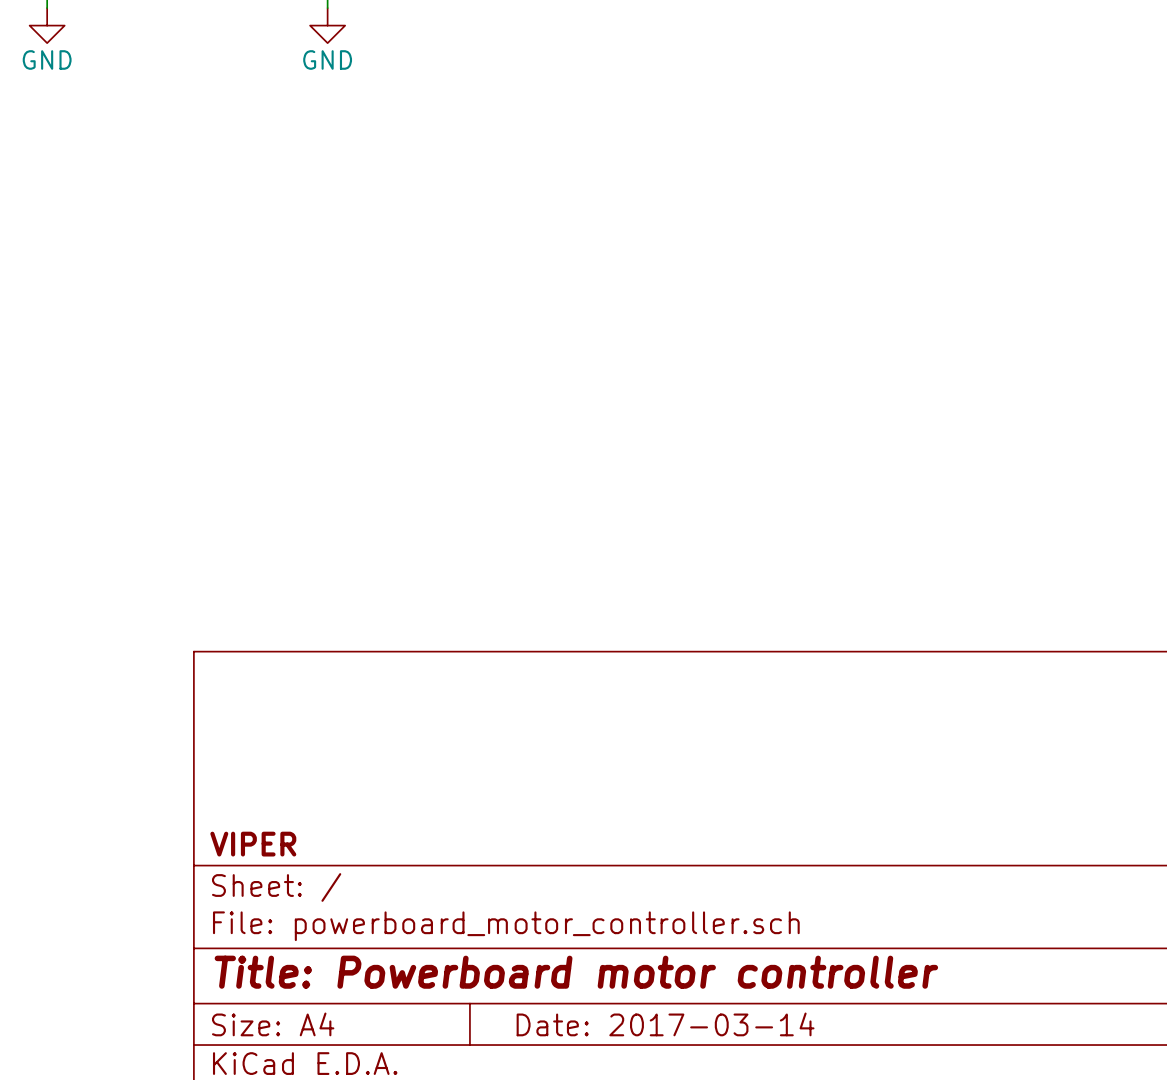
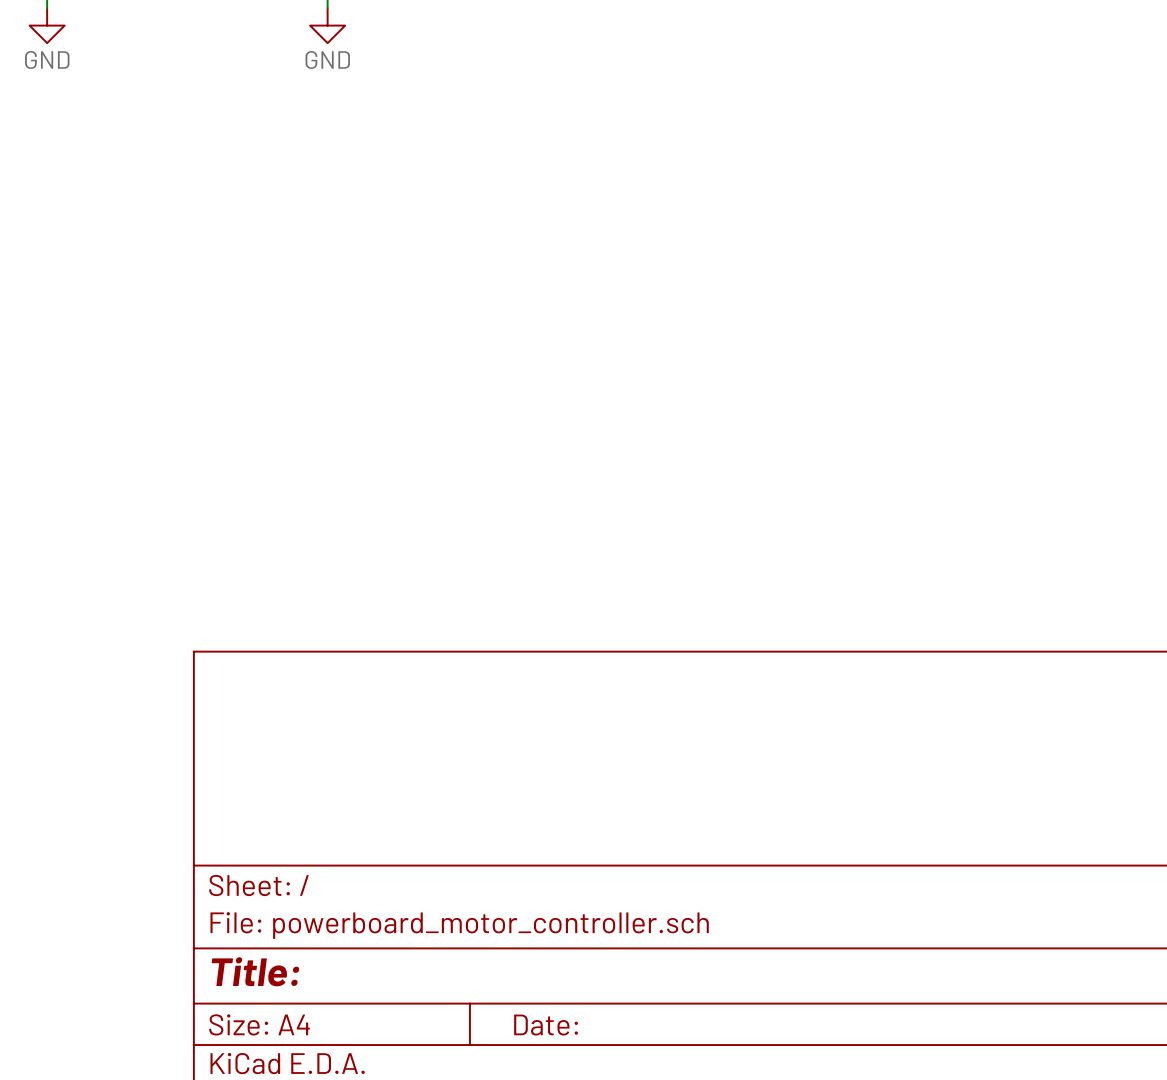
title block: VIPER (253, 844) -> none
title block: Title: Powerboard motor controller (576, 972) -> Title: (255, 971)
title block: Date: 2017-03-14 (665, 1024) -> Date: (546, 1025)

